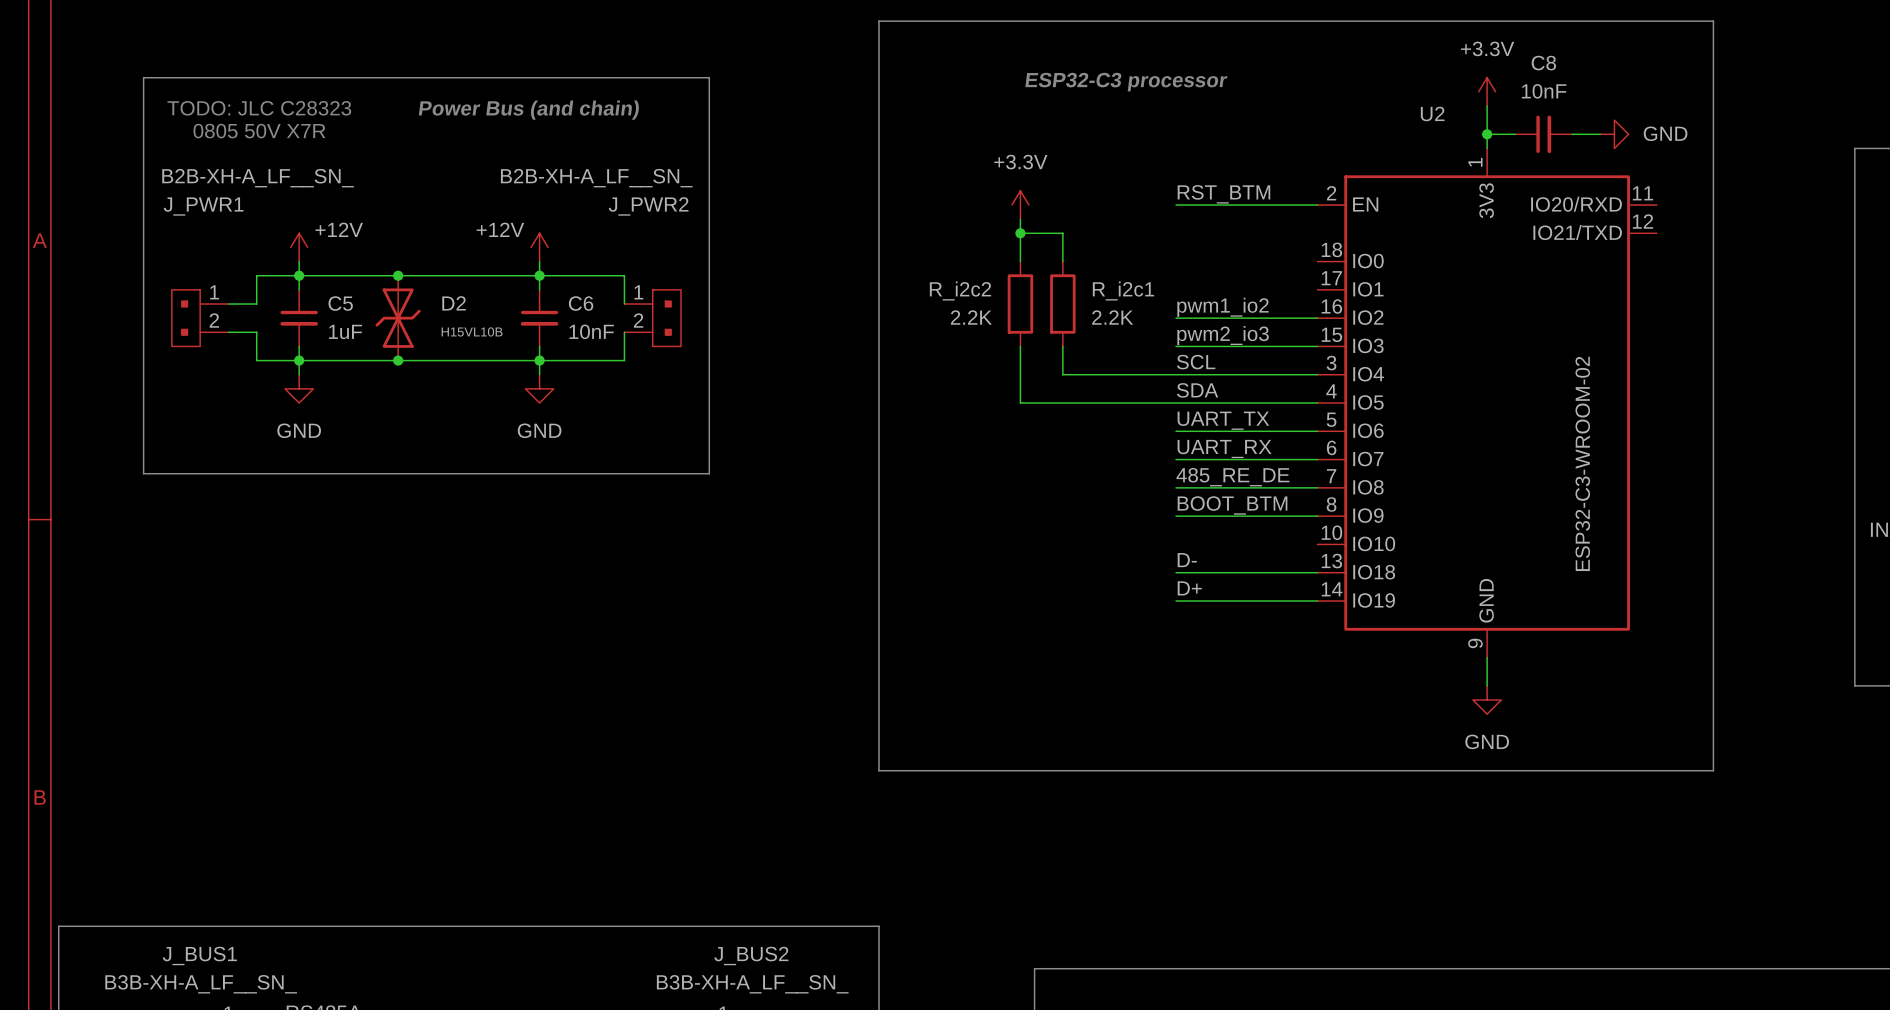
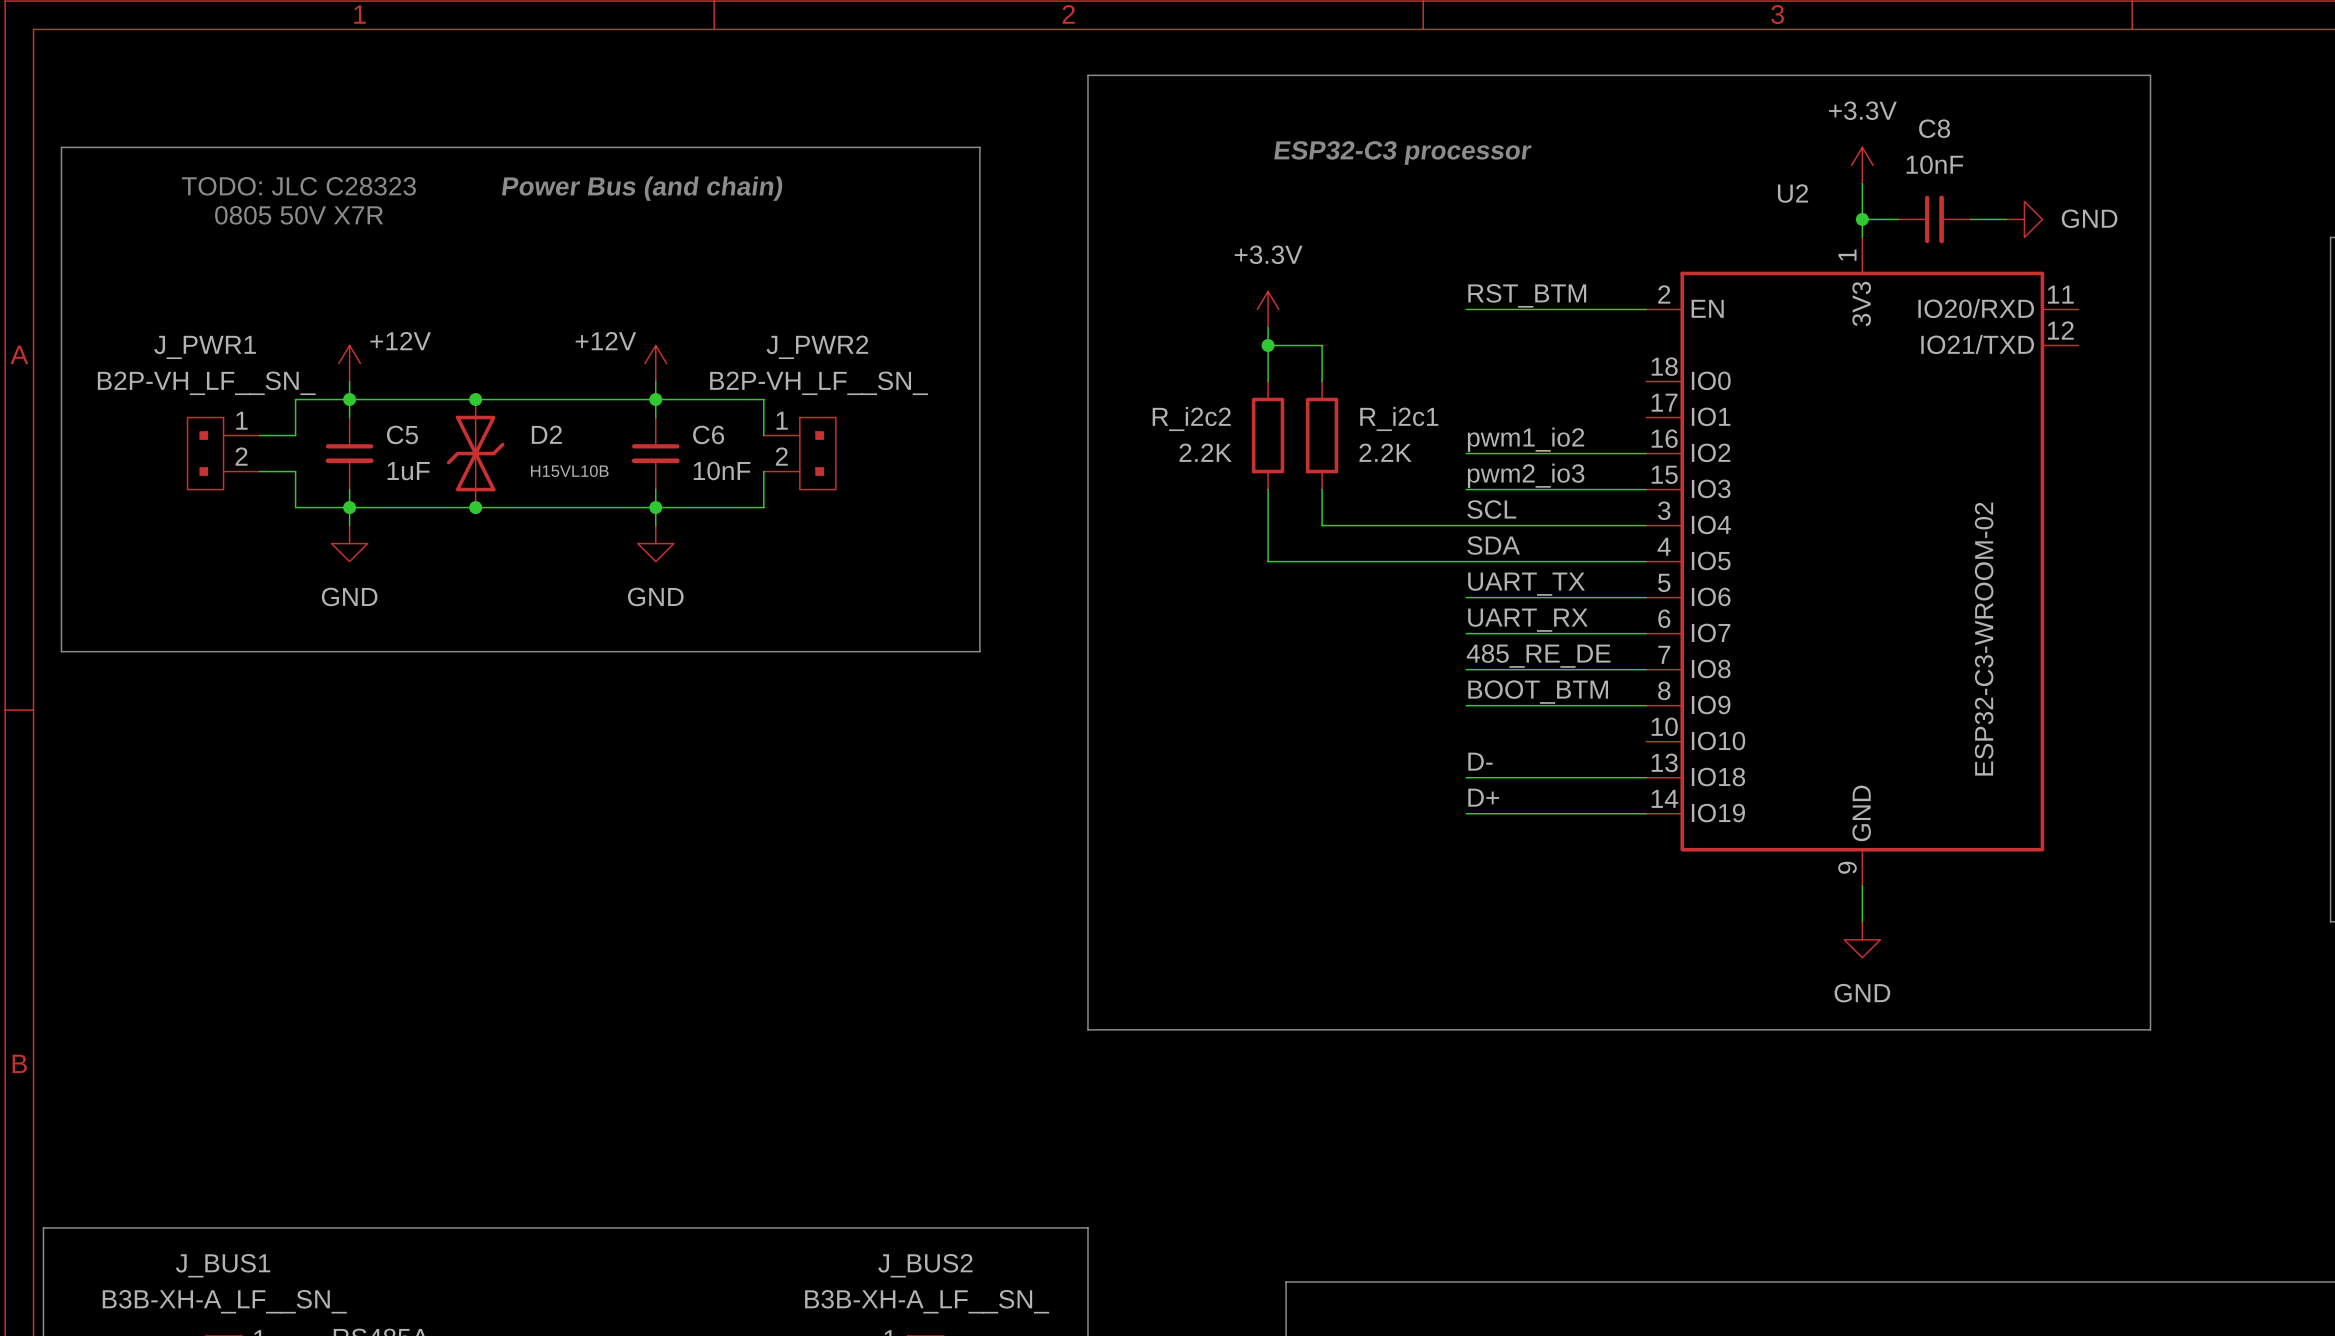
line: (143, 77) (143, 473) -> (151, 147) (61, 147) (61, 651) (151, 651)
line: (709, 77) (709, 473) -> (871, 147) (979, 147) (979, 651) (871, 651)
J_PWR1 value: B2B-XH-A_LF__SN_ (258, 178) -> B2P-VH_LF__SN_ (206, 383)
J_PWR2 value: B2B-XH-A_LF__SN_ (596, 178) -> B2P-VH_LF__SN_ (819, 383)
J_PWR1 name position: J_PWR1 (203, 206) -> J_PWR1 (205, 347)
J_PWR2 name position: J_PWR2 (648, 206) -> J_PWR2 (817, 347)

